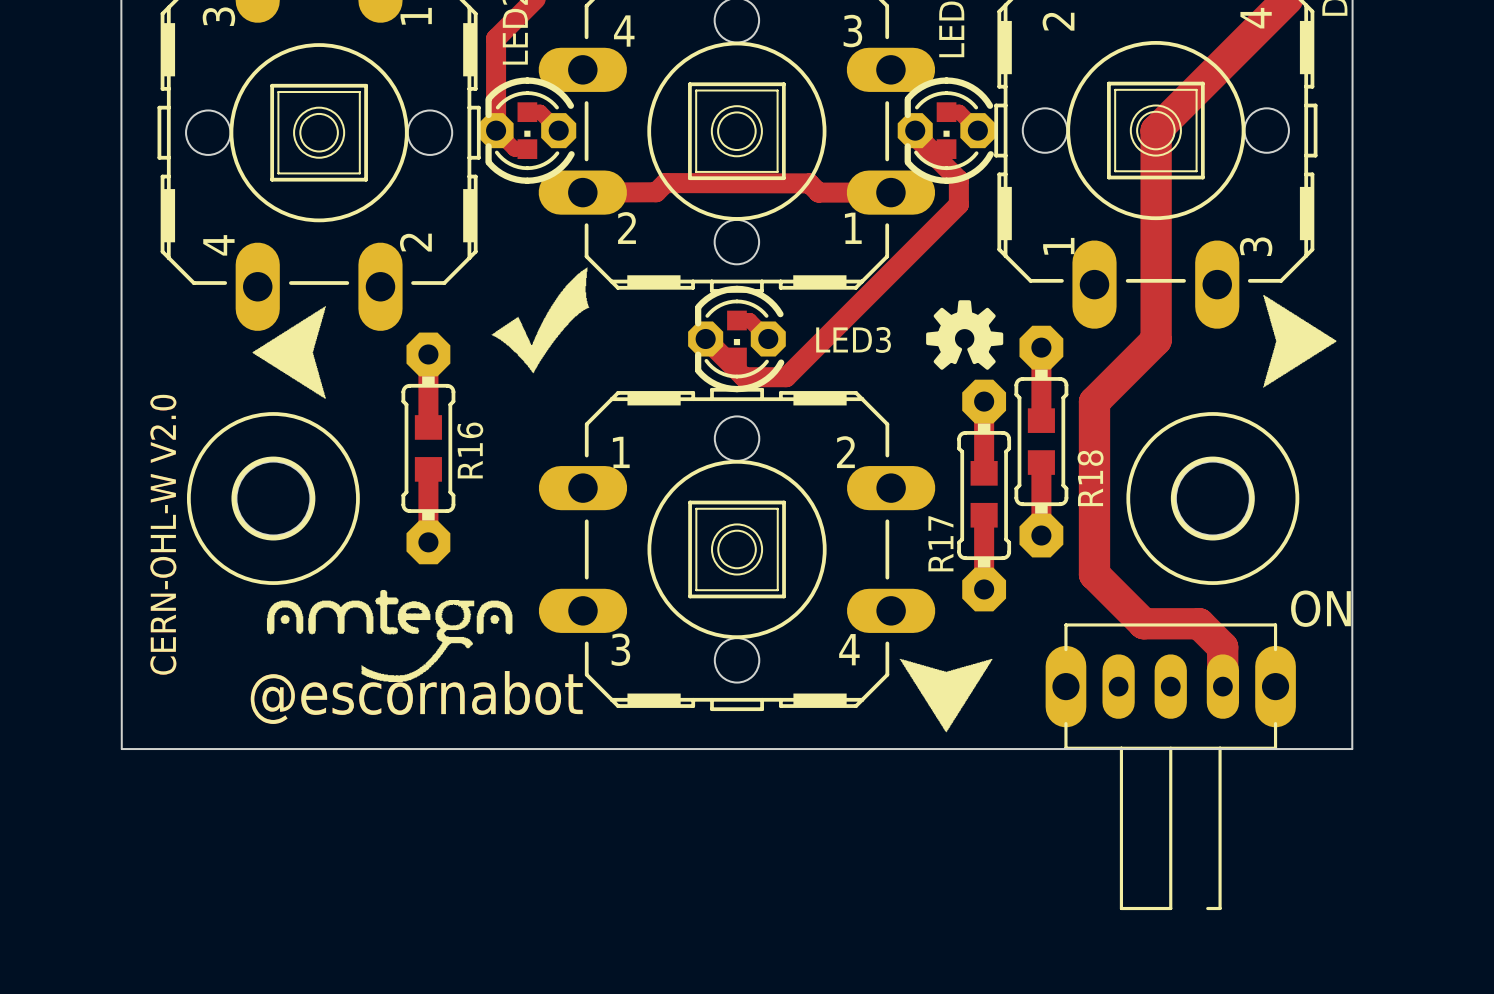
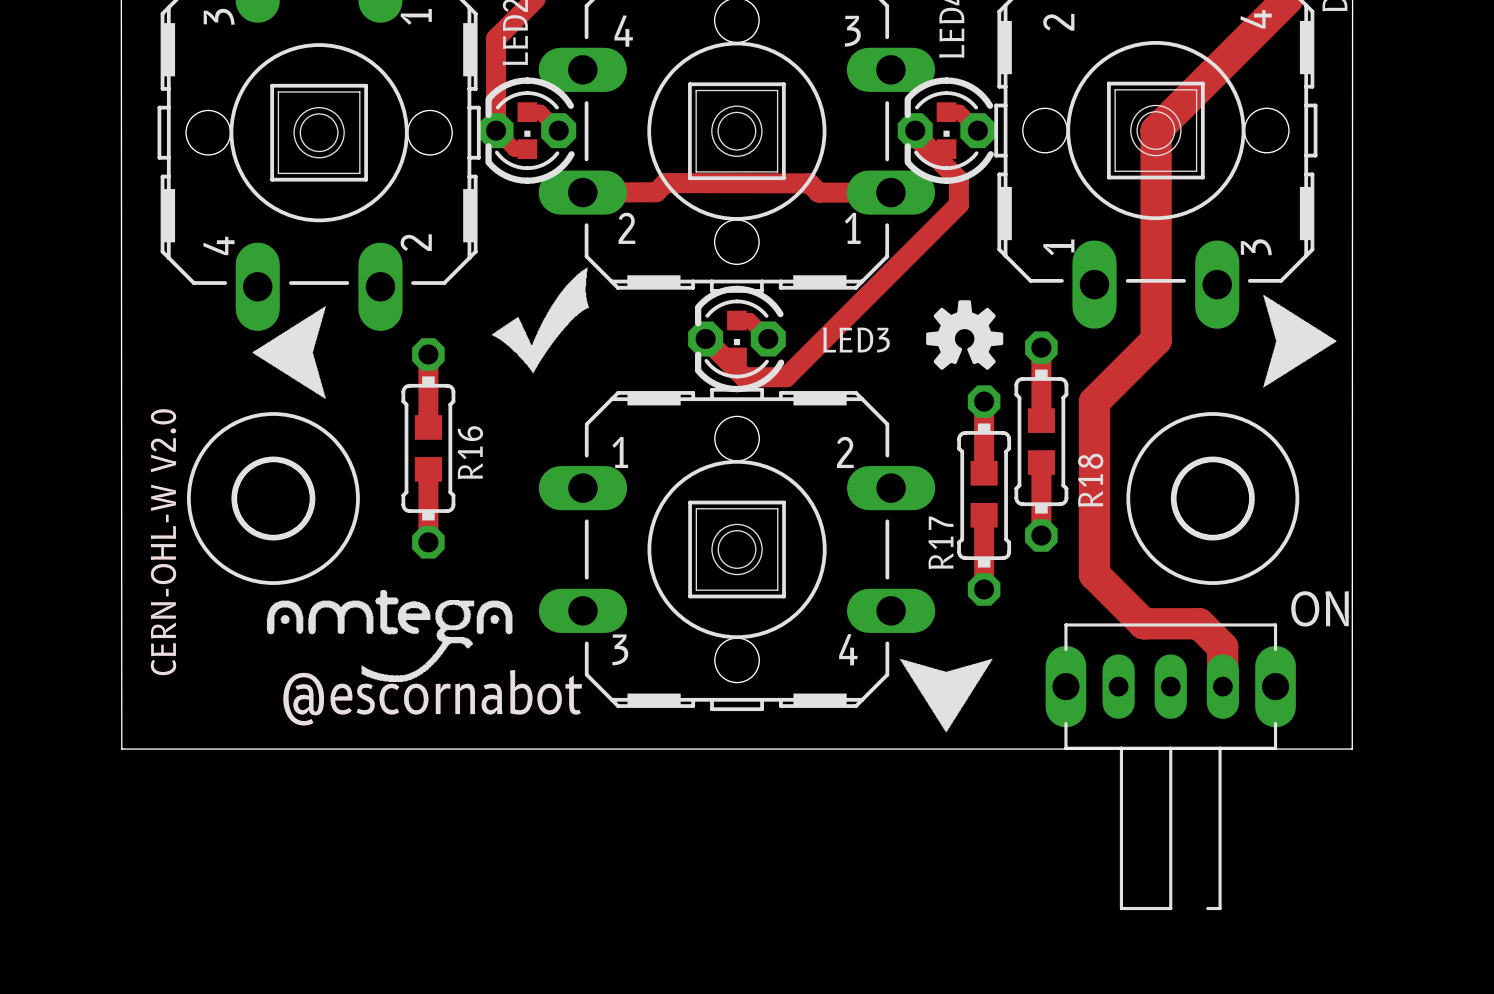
R18 footprint: [1014, 325, 1069, 558] -> [1014, 331, 1069, 552]
R16 footprint: [401, 332, 456, 565] -> [401, 338, 456, 559]
R17 footprint: [957, 379, 1012, 612] -> [957, 385, 1012, 606]

